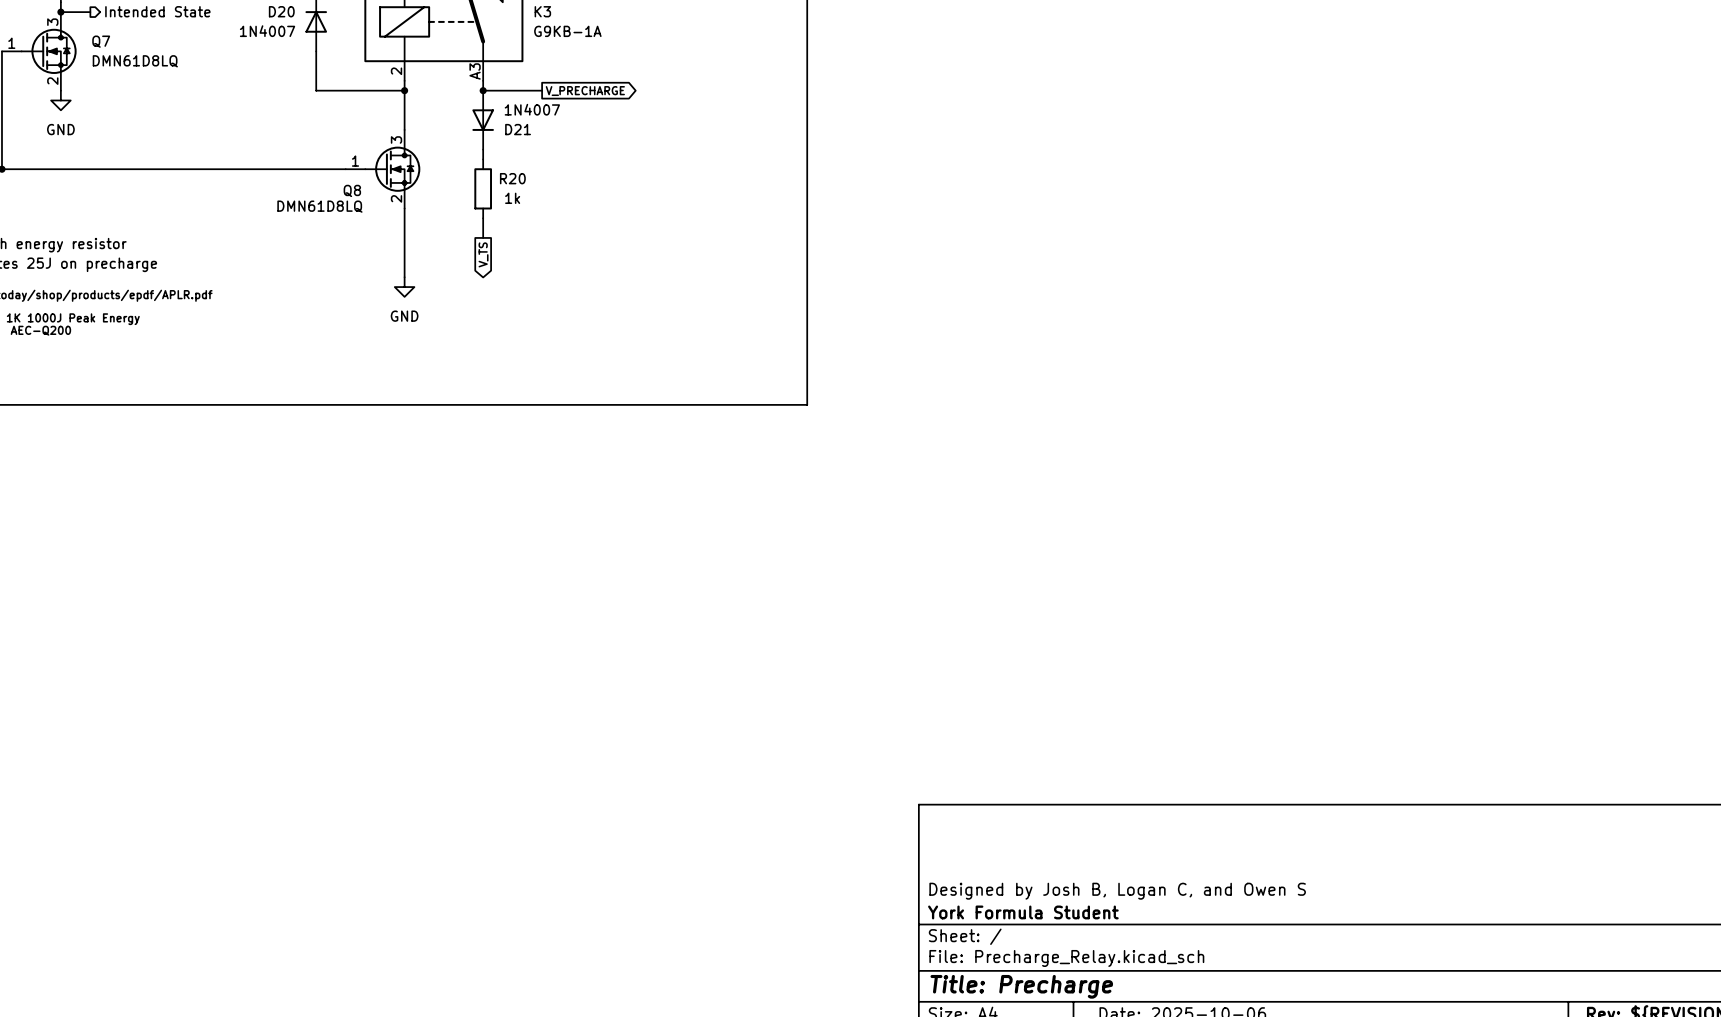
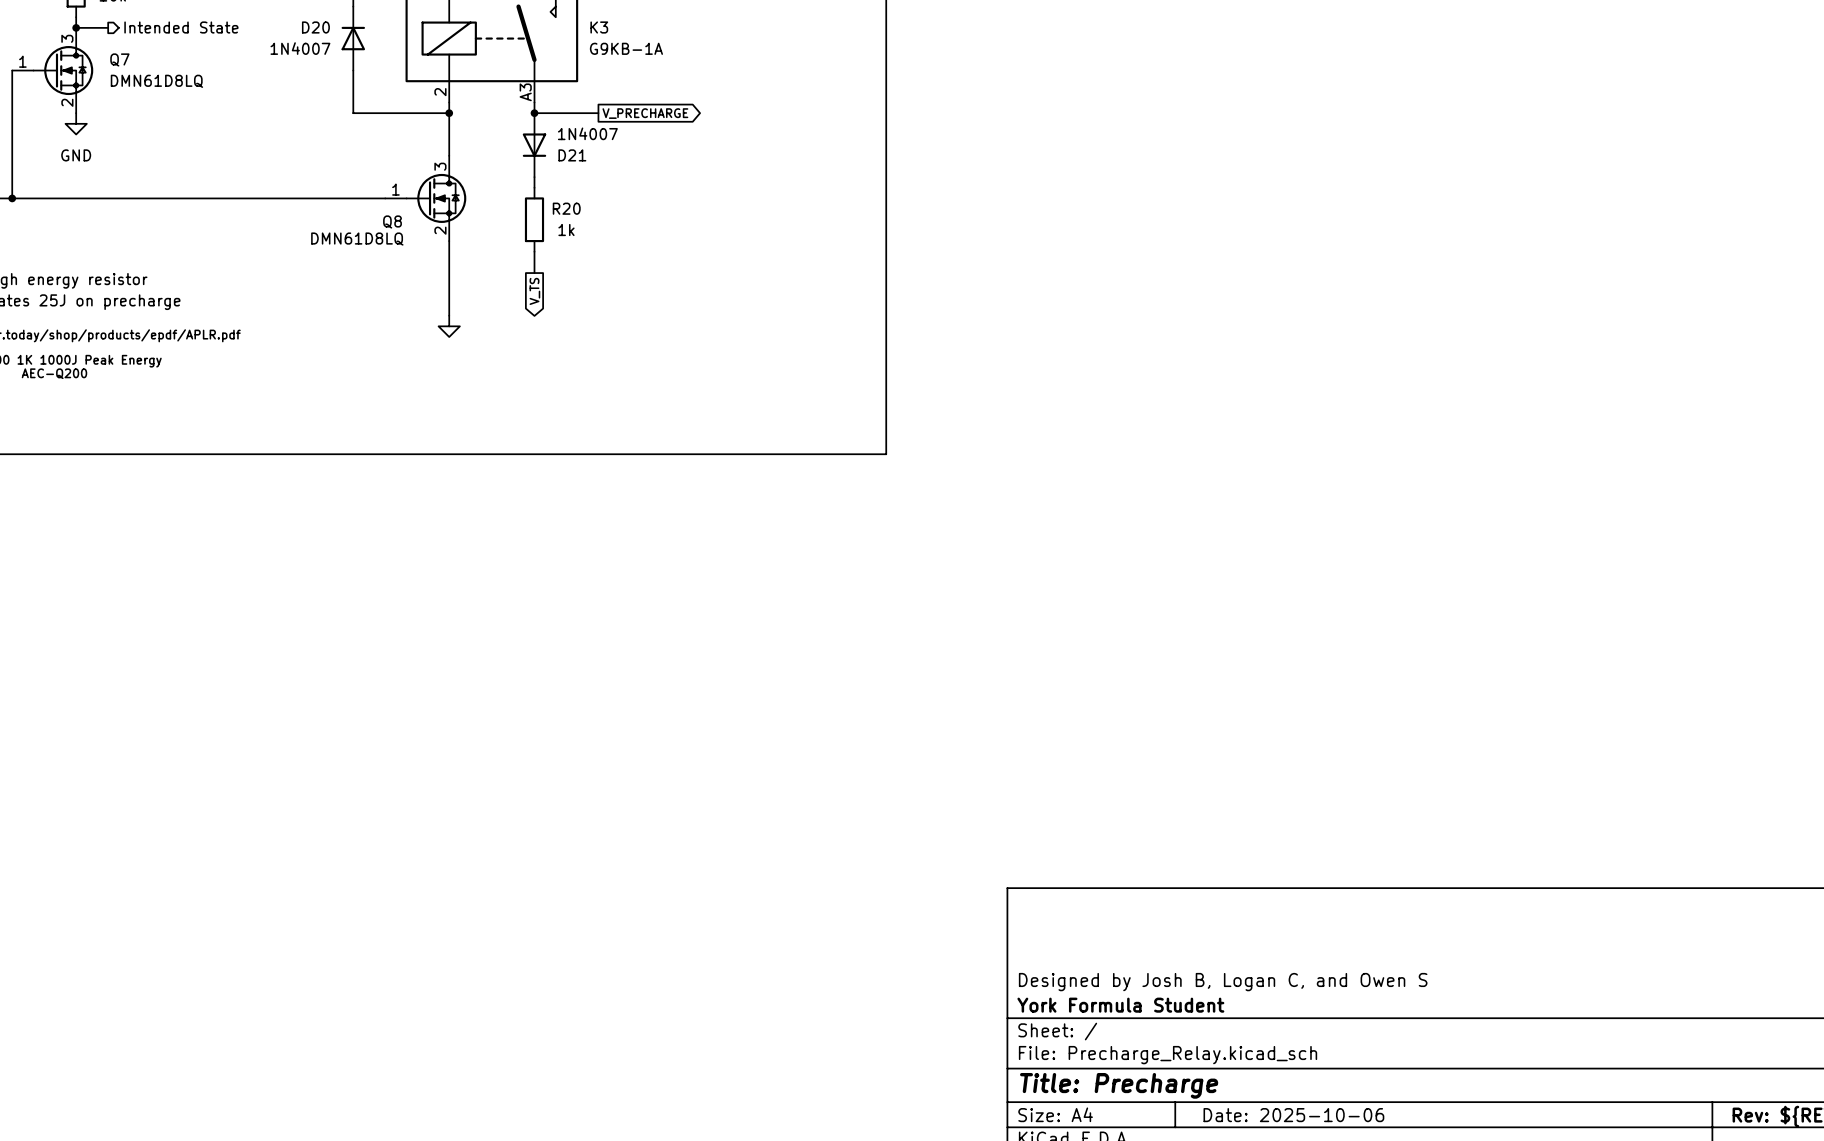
power symbol text: GND (404, 316) -> none

